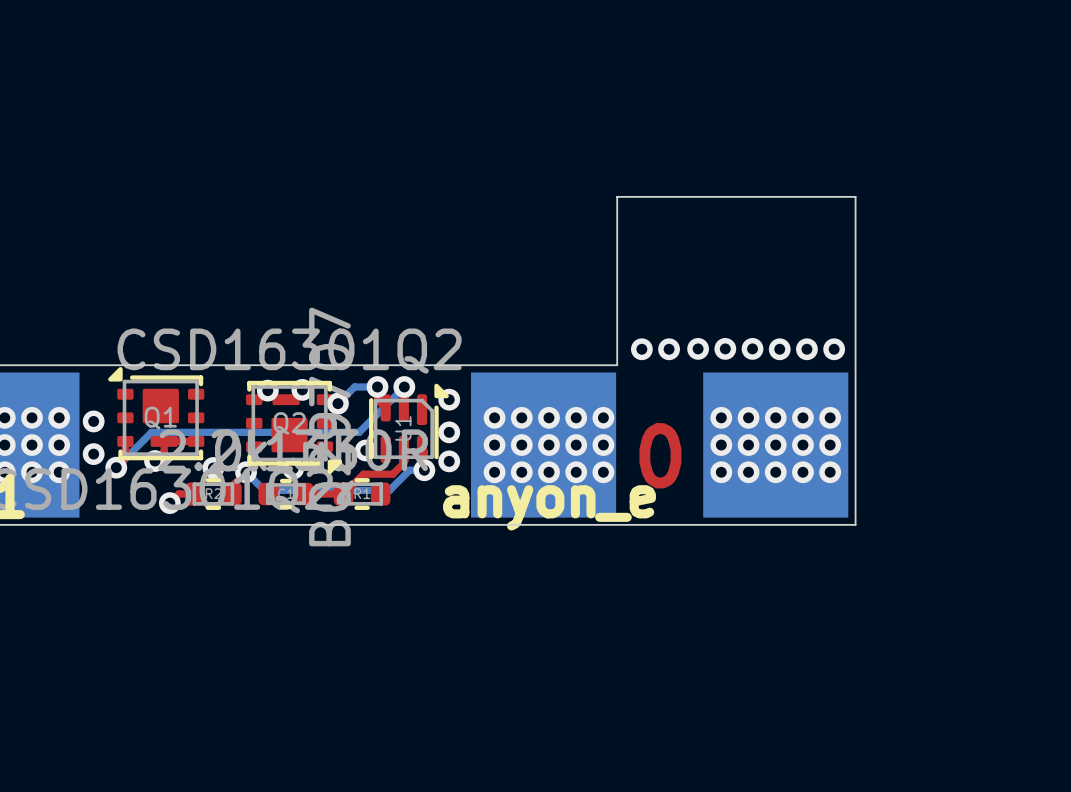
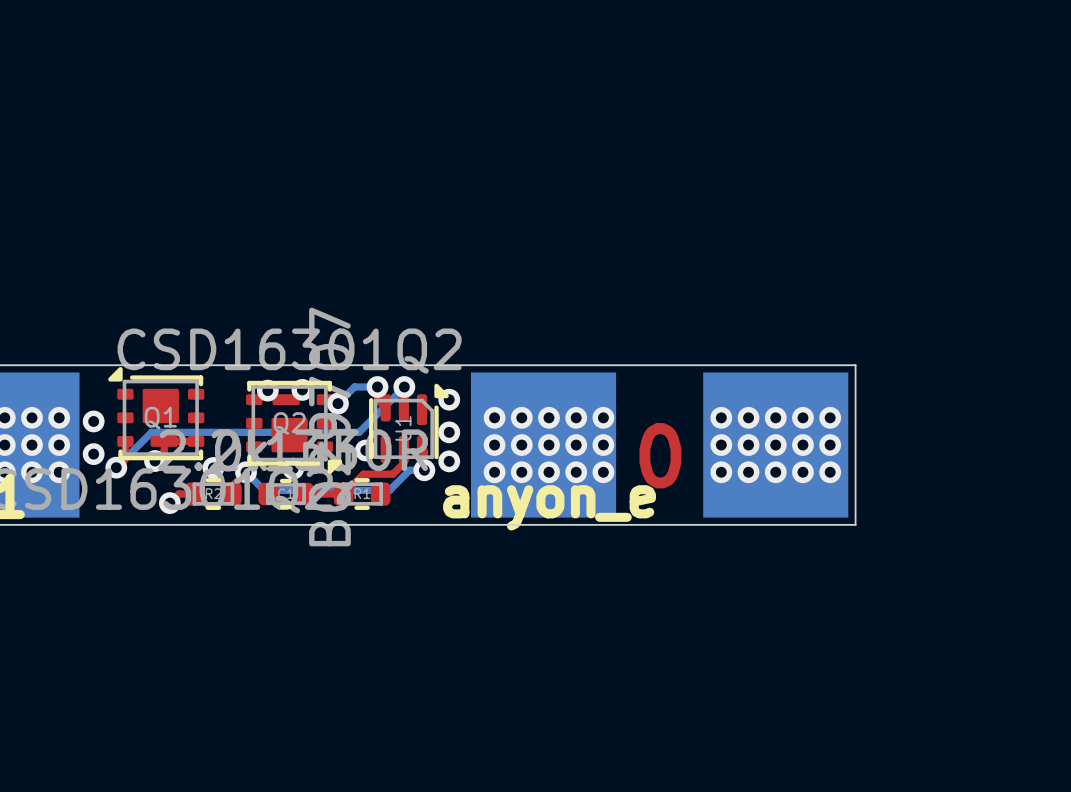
via: (698, 348) -> none
via: (725, 348) -> none
via: (752, 348) -> none
via: (641, 349) -> none
via: (669, 349) -> none
via: (779, 349) -> none
via: (806, 349) -> none
via: (834, 349) -> none
board edge: (617, 365) (617, 196) (855, 196) (855, 365) -> (617, 365) (855, 365)

